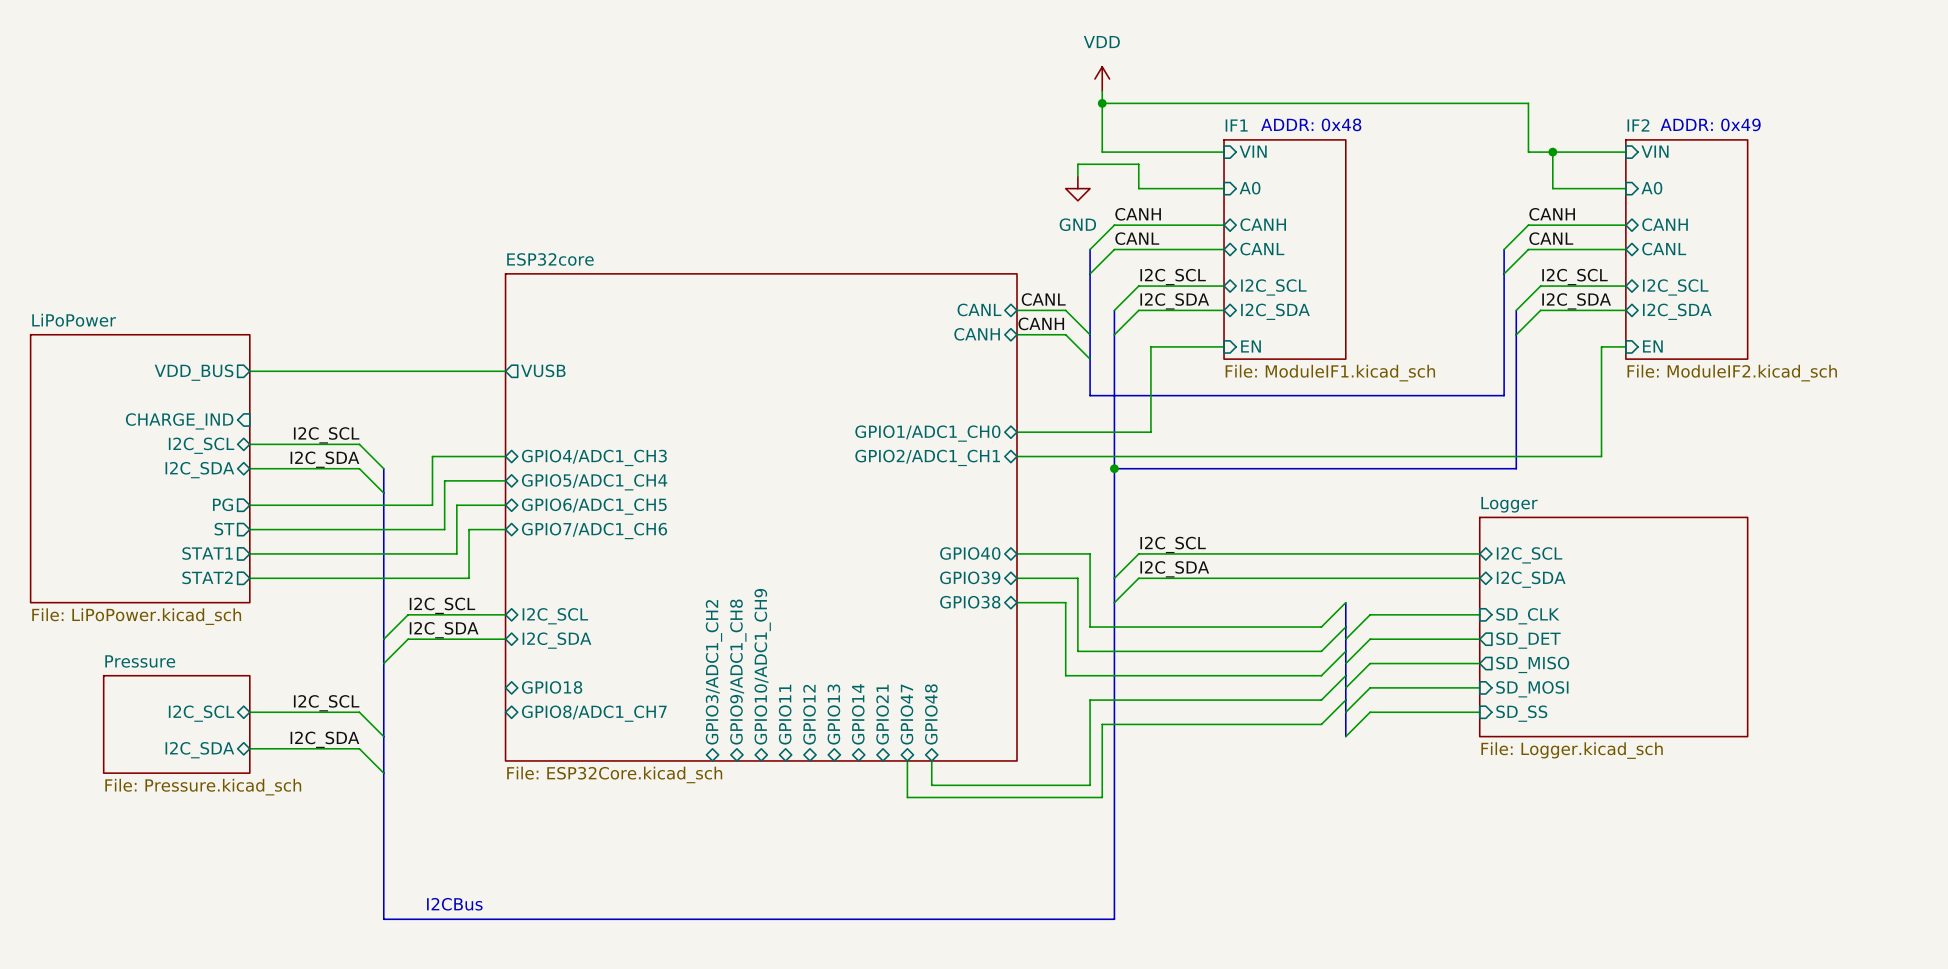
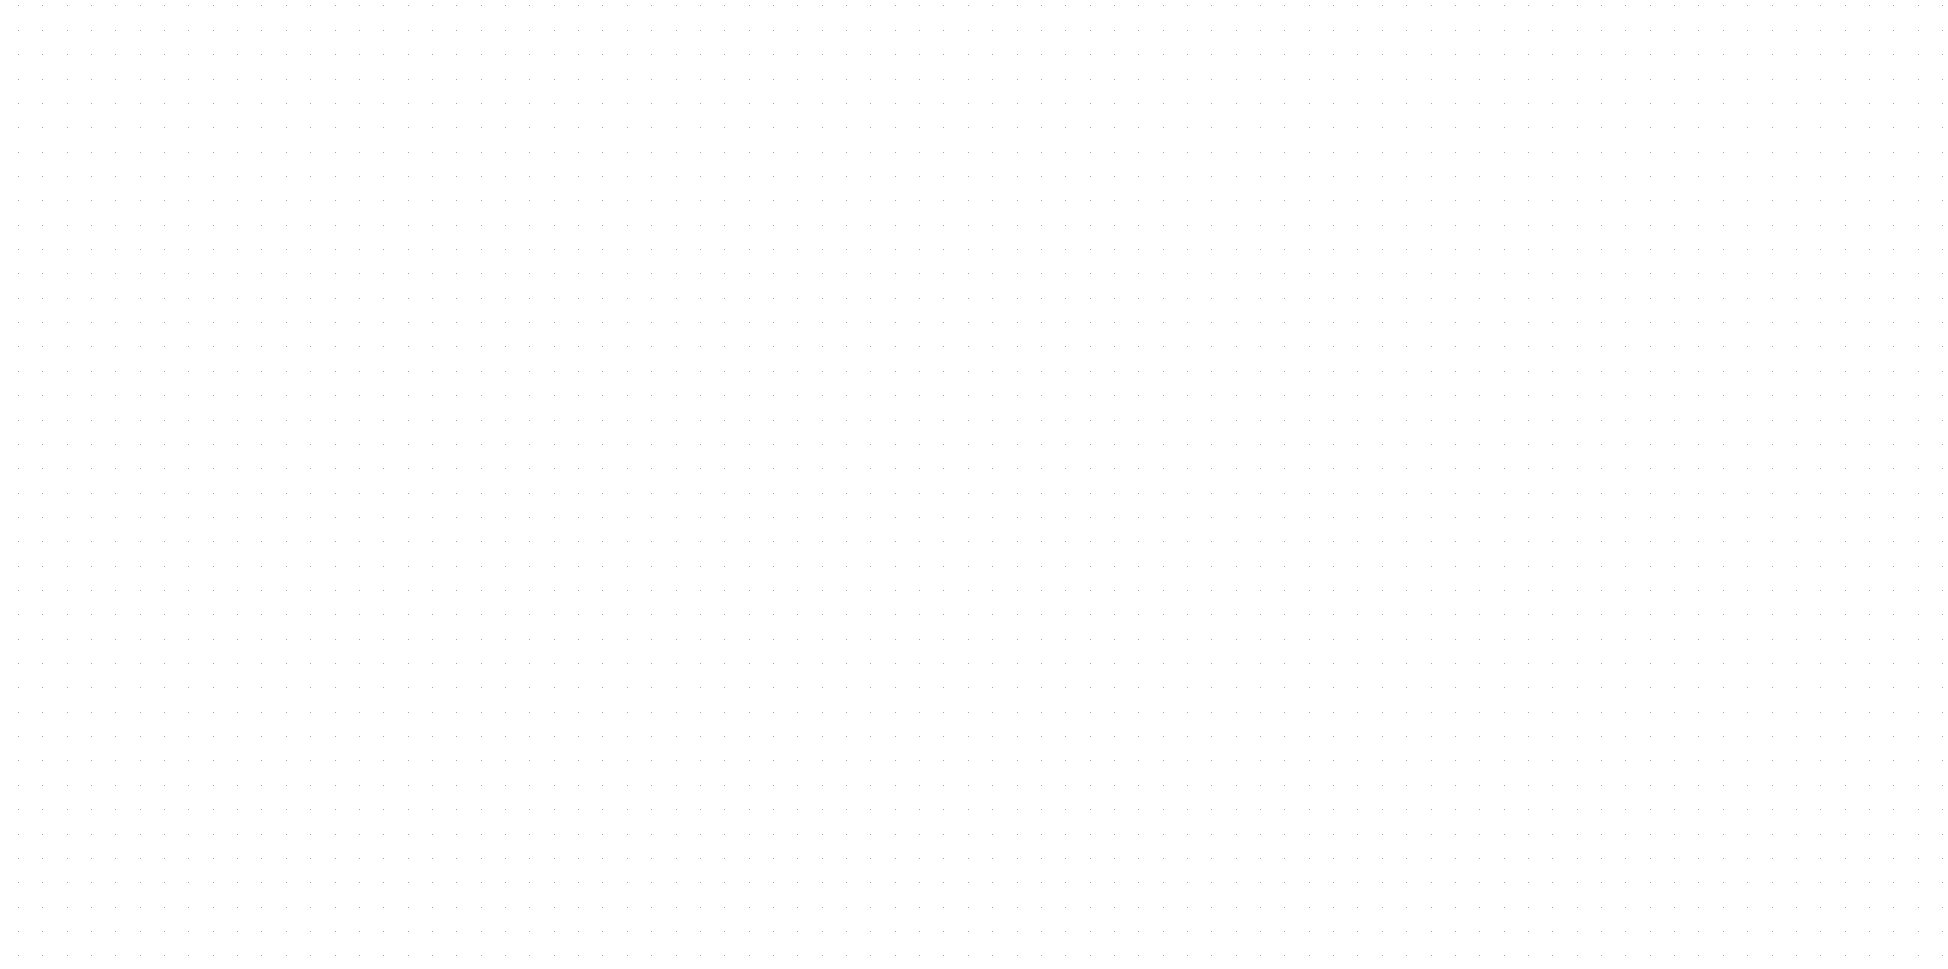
power symbol: VDD (1102, 79) -> none
wire: (1102, 91) (1102, 152) (1224, 152) -> none
wire: (1102, 103) (1528, 103) (1528, 152) (1625, 152) -> none
junction: (1102, 103) -> none
text: ADDR: 0x48 (1311, 124) -> none
text: ADDR: 0x49 (1710, 124) -> none
sheet pin: VIN (1253, 151) -> none
sheet pin: VIN (1655, 151) -> none
wire: (1552, 152) (1552, 188) (1625, 188) -> none
junction: (1552, 152) -> none
wire: (1077, 176) (1077, 164) (1138, 164) (1138, 188) (1224, 188) -> none
power symbol: GND (1077, 188) -> none
sheet pin: A0 (1250, 188) -> none
sheet pin: A0 (1651, 188) -> none
label: CANH (1138, 214) -> none
label: CANH (1552, 214) -> none
sheet pin: CANH (1263, 224) -> none
sheet pin: CANH (1665, 224) -> none
wire: (1224, 225) (1114, 225) (1090, 249) -> none
wire: (1625, 225) (1528, 225) (1504, 249) -> none
label: CANL (1137, 238) -> none
label: CANL (1551, 238) -> none
bus: (1090, 249) (1090, 395) (1504, 395) (1504, 249) -> none
wire: (1224, 249) (1114, 249) (1090, 273) -> none
sheet pin: CANL (1262, 249) -> none
sheet IF1: File: ModuleIF1.kicad_sch (1284, 249) -> none
wire: (1625, 249) (1528, 249) (1504, 273) -> none
sheet pin: CANL (1664, 249) -> none
sheet IF2: File: ModuleIF2.kicad_sch (1686, 249) -> none
label: I2C_SCL (1173, 277) -> none
label: I2C_SCL (1574, 277) -> none
wire: (1224, 286) (1138, 286) (1114, 310) -> none
wire: (1625, 286) (1540, 286) (1516, 310) -> none
sheet pin: I2C_SCL (1273, 287) -> none
sheet pin: I2C_SCL (1675, 287) -> none
label: CANL (1043, 299) -> none
label: I2C_SDA (1174, 301) -> none
label: I2C_SDA (1576, 301) -> none
sheet pin: CANL (979, 309) -> none
wire: (1017, 310) (1065, 310) (1090, 334) -> none
bus: (1114, 310) (1114, 919) (383, 919) (383, 468) -> none
wire: (1224, 310) (1138, 310) (1114, 334) -> none
bus: (1516, 310) (1516, 468) (1114, 468) -> none
wire: (1625, 310) (1540, 310) (1516, 334) -> none
sheet pin: I2C_SDA (1275, 311) -> none
sheet pin: I2C_SDA (1677, 311) -> none
label: CANH (1041, 323) -> none
sheet pin: CANH (977, 334) -> none
wire: (1017, 334) (1065, 334) (1090, 359) -> none
wire: (1224, 346) (1150, 346) (1150, 432) (1017, 432) -> none
sheet pin: EN (1251, 346) -> none
wire: (1625, 346) (1601, 346) (1601, 456) (1017, 456) -> none
sheet pin: EN (1652, 346) -> none
sheet pin: VUSB (543, 370) -> none
wire: (249, 371) (505, 371) -> none
sheet pin: VDD_BUS (194, 372) -> none
sheet pin: CHARGE_IND (179, 421) -> none
sheet pin: GPIO1/ADC1_CH0 (927, 433) -> none
label: I2C_SCL (326, 435) -> none
wire: (249, 444) (359, 444) (383, 468) -> none
sheet pin: I2C_SCL (201, 445) -> none
wire: (505, 456) (432, 456) (432, 505) (249, 505) -> none
sheet pin: GPIO4/ADC1_CH3 (594, 457) -> none
sheet pin: GPIO2/ADC1_CH1 (927, 457) -> none
label: I2C_SDA (324, 459) -> none
sheet LiPoPower: File: LiPoPower.kicad_sch (140, 468) -> none
wire: (249, 468) (359, 468) (383, 493) -> none
junction: (1114, 468) -> none
sheet pin: I2C_SDA (199, 470) -> none
wire: (505, 480) (444, 480) (444, 529) (249, 529) -> none
sheet pin: GPIO5/ADC1_CH4 (594, 482) -> none
sheet pin: PG (222, 504) -> none
wire: (505, 505) (456, 505) (456, 553) (249, 553) -> none
sheet pin: GPIO6/ADC1_CH5 (594, 506) -> none
sheet ESP32core: File: ESP32Core.kicad_sch (761, 517) -> none
sheet pin: ST (224, 529) -> none
wire: (505, 529) (469, 529) (469, 578) (249, 578) -> none
sheet pin: GPIO7/ADC1_CH6 (594, 531) -> none
label: I2C_SCL (1173, 544) -> none
sheet pin: STAT1 (207, 553) -> none
sheet pin: GPIO40 (970, 553) -> none
wire: (1017, 553) (1090, 553) (1090, 627) (1321, 627) (1345, 602) -> none
wire: (1479, 553) (1138, 553) (1114, 578) -> none
sheet pin: I2C_SCL (1529, 555) -> none
label: I2C_SDA (1174, 569) -> none
sheet pin: STAT2 (207, 577) -> none
sheet pin: GPIO39 (970, 577) -> none
wire: (1017, 578) (1077, 578) (1077, 651) (1321, 651) (1345, 627) -> none
wire: (1479, 578) (1138, 578) (1114, 602) -> none
sheet pin: I2C_SDA (1531, 579) -> none
sheet pin: GPIO38 (970, 602) -> none
wire: (1017, 602) (1065, 602) (1065, 675) (1321, 675) (1345, 651) -> none
bus: (1345, 602) (1345, 736) -> none
label: I2C_SCL (442, 605) -> none
wire: (505, 614) (408, 614) (383, 639) -> none
wire: (1479, 614) (1370, 614) (1345, 639) -> none
sheet pin: I2C_SCL (555, 616) -> none
sheet pin: SD_CLK (1527, 616) -> none
sheet Logger: File: Logger.kicad_sch (1613, 627) -> none
label: I2C_SDA (444, 630) -> none
wire: (505, 639) (408, 639) (383, 663) -> none
wire: (1479, 639) (1370, 639) (1345, 663) -> none
sheet pin: I2C_SDA (556, 640) -> none
sheet pin: SD_DET (1528, 640) -> none
wire: (1479, 663) (1370, 663) (1345, 687) -> none
sheet pin: SD_MISO (1532, 664) -> none
sheet pin: GPIO10/ADC1_CH9 (762, 666) -> none
sheet pin: GPIO3/ADC1_CH2 (713, 672) -> none
sheet pin: GPIO9/ADC1_CH8 (738, 672) -> none
wire: (1345, 675) (1321, 700) (1090, 700) (1090, 785) (931, 785) (931, 760) -> none
sheet pin: GPIO18 (552, 687) -> none
wire: (1479, 687) (1370, 687) (1345, 712) -> none
sheet pin: SD_MOSI (1532, 689) -> none
wire: (1345, 700) (1321, 724) (1102, 724) (1102, 797) (907, 797) (907, 760) -> none
label: I2C_SCL (326, 703) -> none
wire: (249, 712) (359, 712) (383, 736) -> none
wire: (1479, 712) (1370, 712) (1345, 736) -> none
sheet pin: I2C_SCL (201, 713) -> none
sheet pin: GPIO8/ADC1_CH7 (594, 713) -> none
sheet pin: SD_SS (1521, 713) -> none
sheet pin: GPIO11 (785, 714) -> none
sheet pin: GPIO12 (809, 714) -> none
sheet pin: GPIO13 (833, 714) -> none
sheet pin: GPIO14 (858, 714) -> none
sheet pin: GPIO21 (882, 714) -> none
sheet pin: GPIO47 (906, 714) -> none
sheet pin: GPIO48 (931, 714) -> none
sheet Pressure: File: Pressure.kicad_sch (176, 724) -> none
label: I2C_SDA (324, 739) -> none
wire: (249, 748) (359, 748) (383, 773) -> none
sheet pin: I2C_SDA (199, 750) -> none
text: I2CBus (454, 904) -> none

